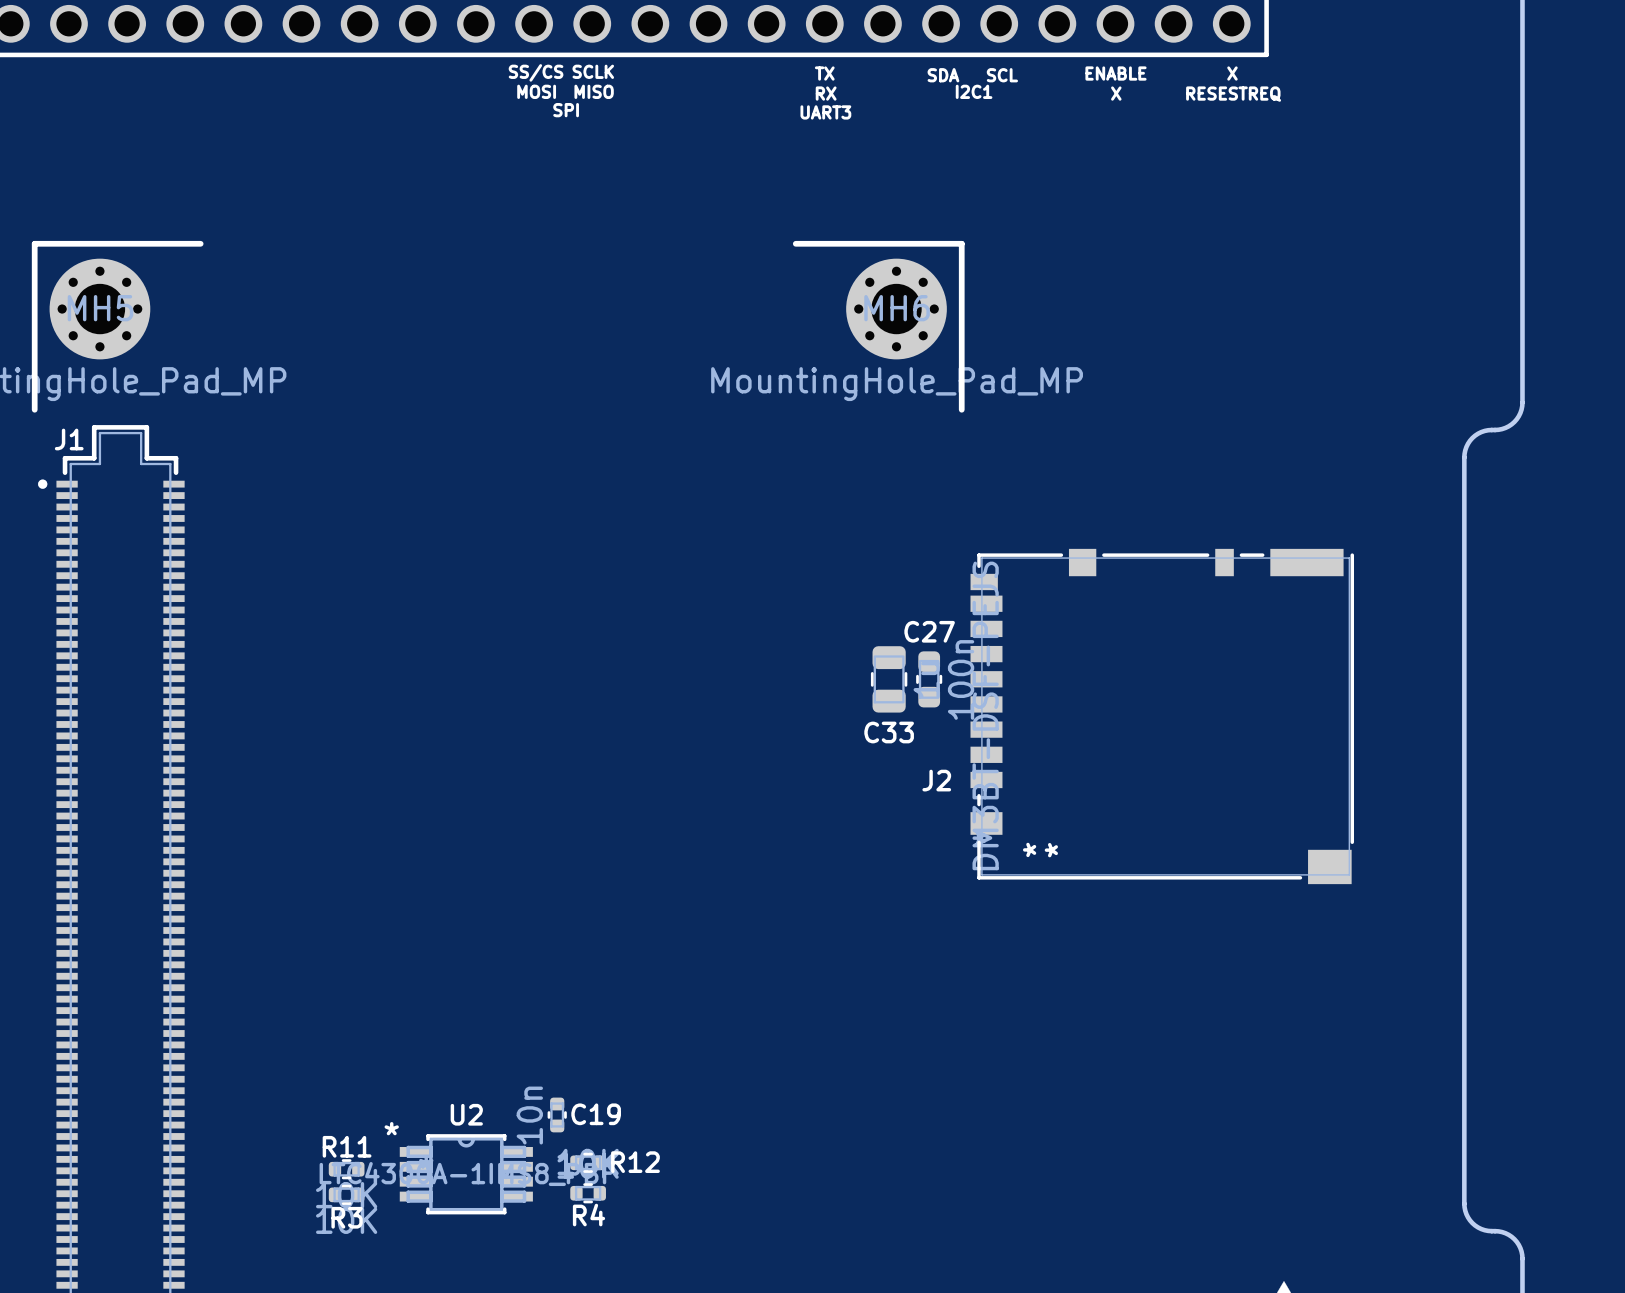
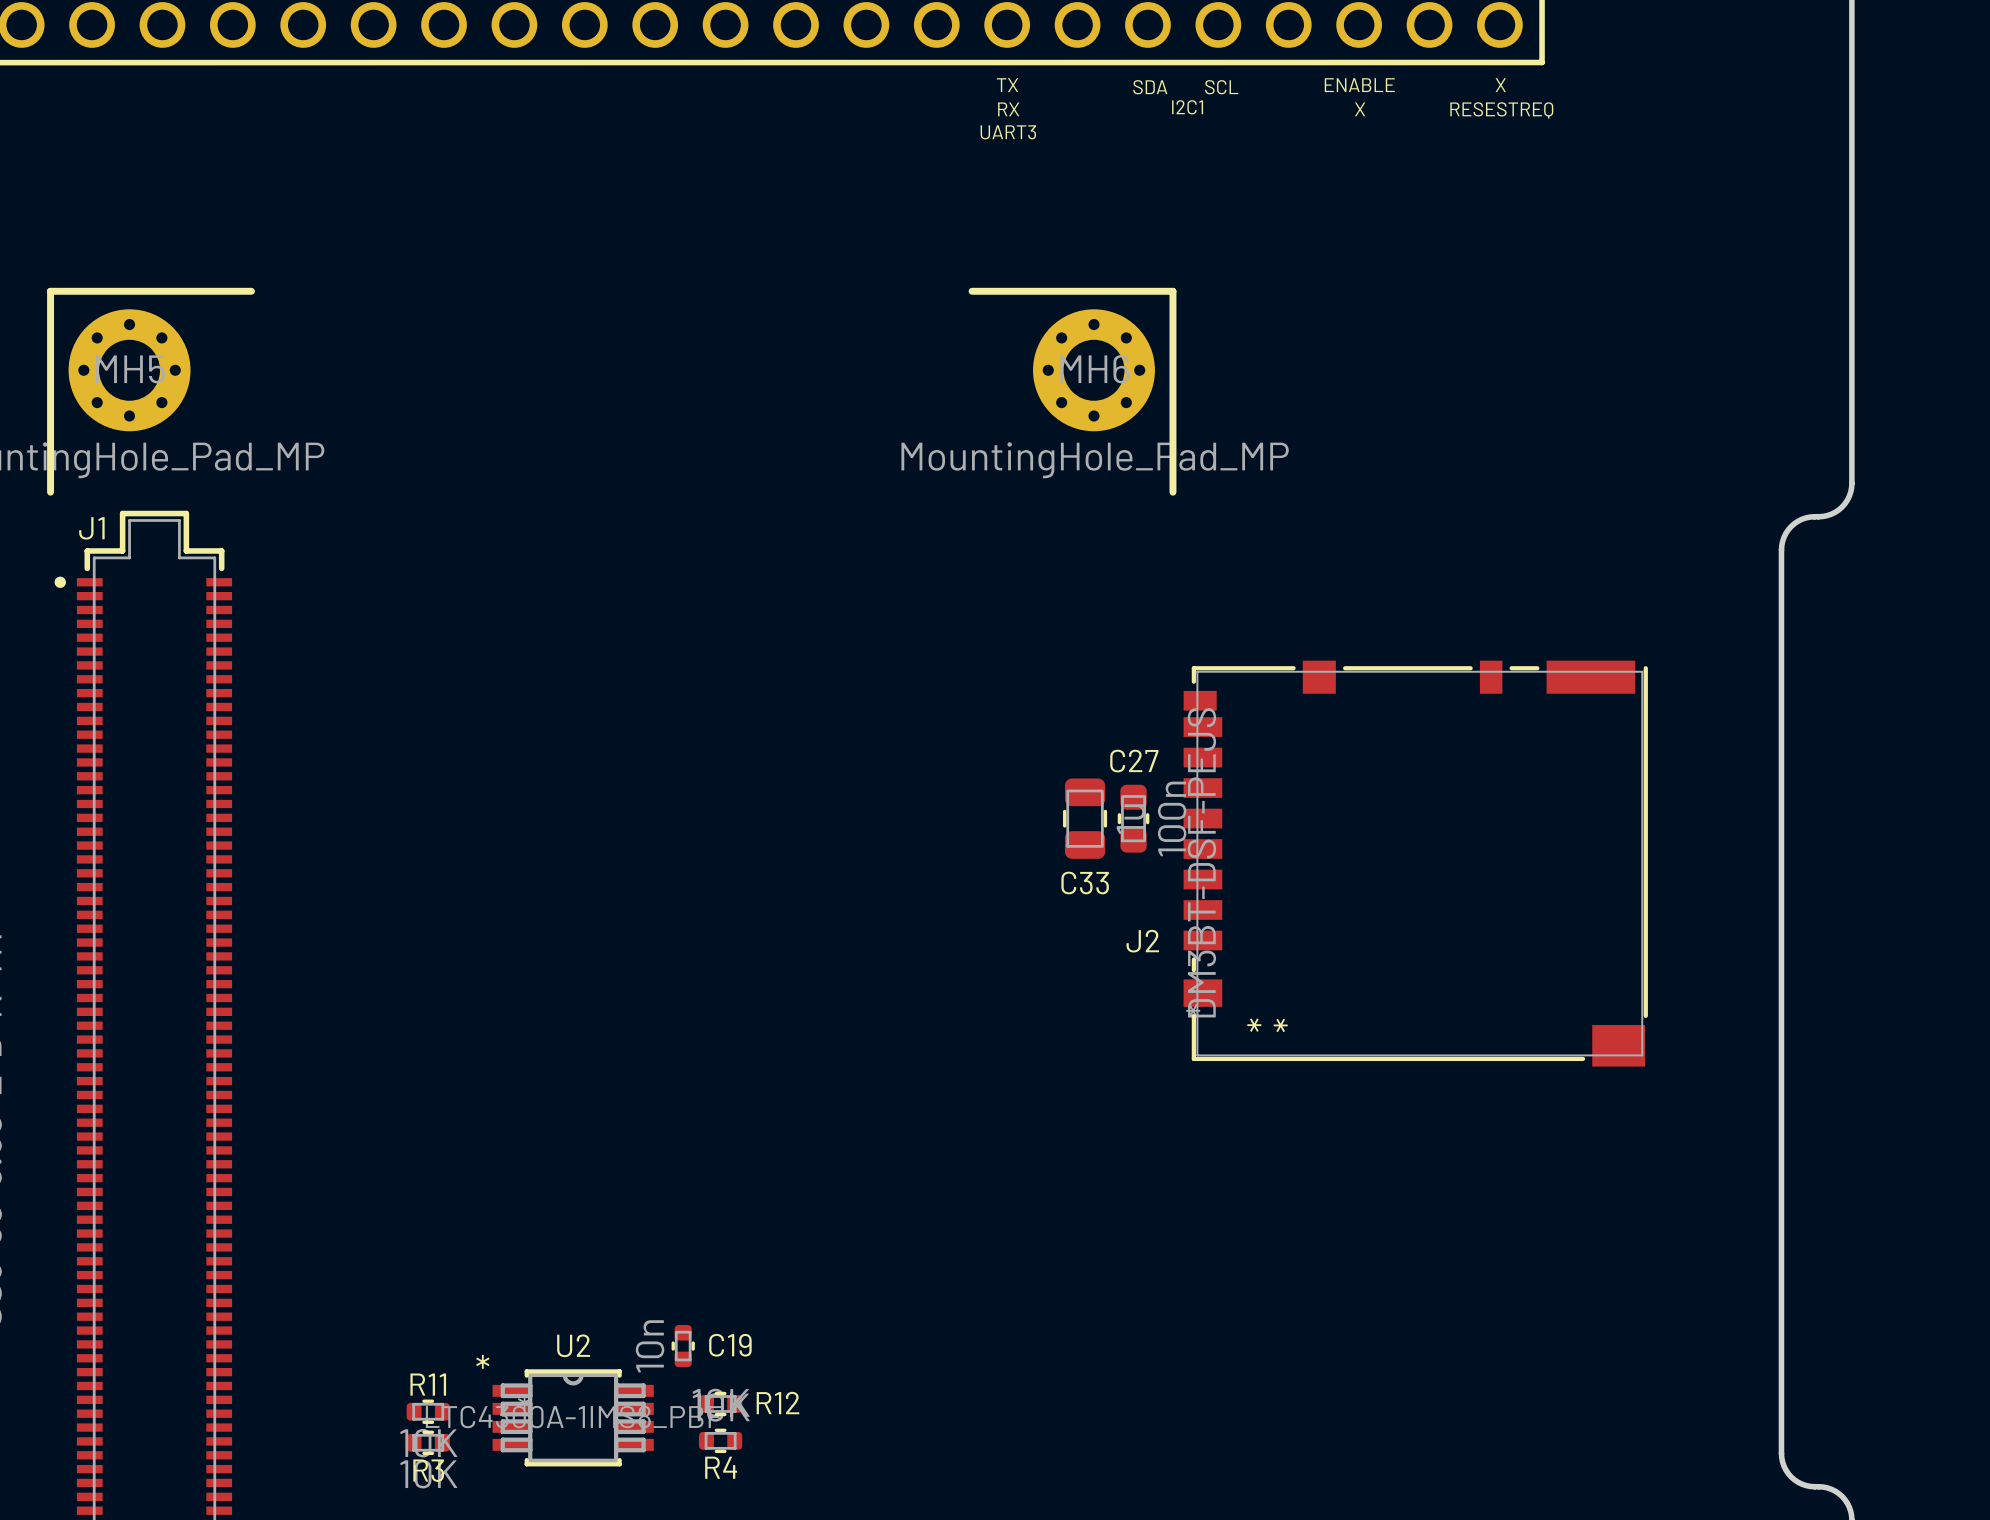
text: SCLK (593, 71) -> none
text: SS/CS (536, 72) -> none
text: MOSI (536, 91) -> none
text: MISO (594, 91) -> none
text: SPI (566, 110) -> none

